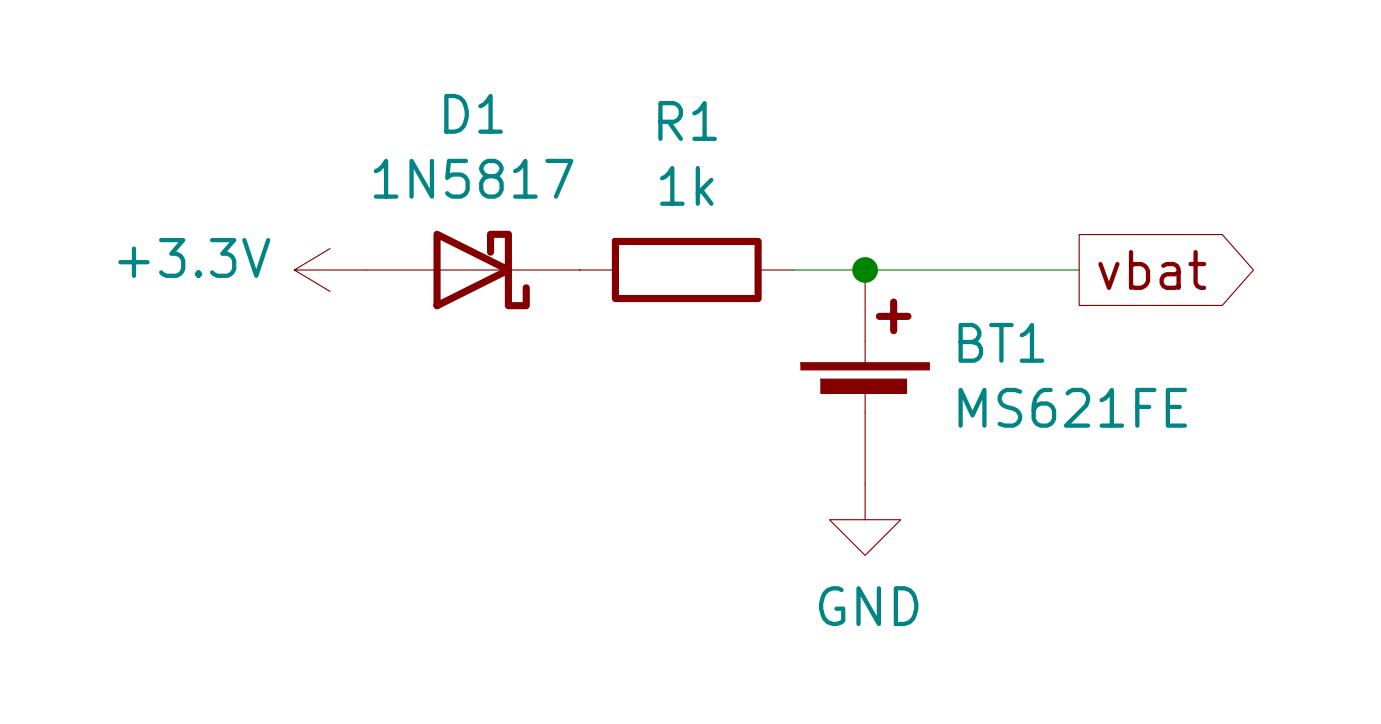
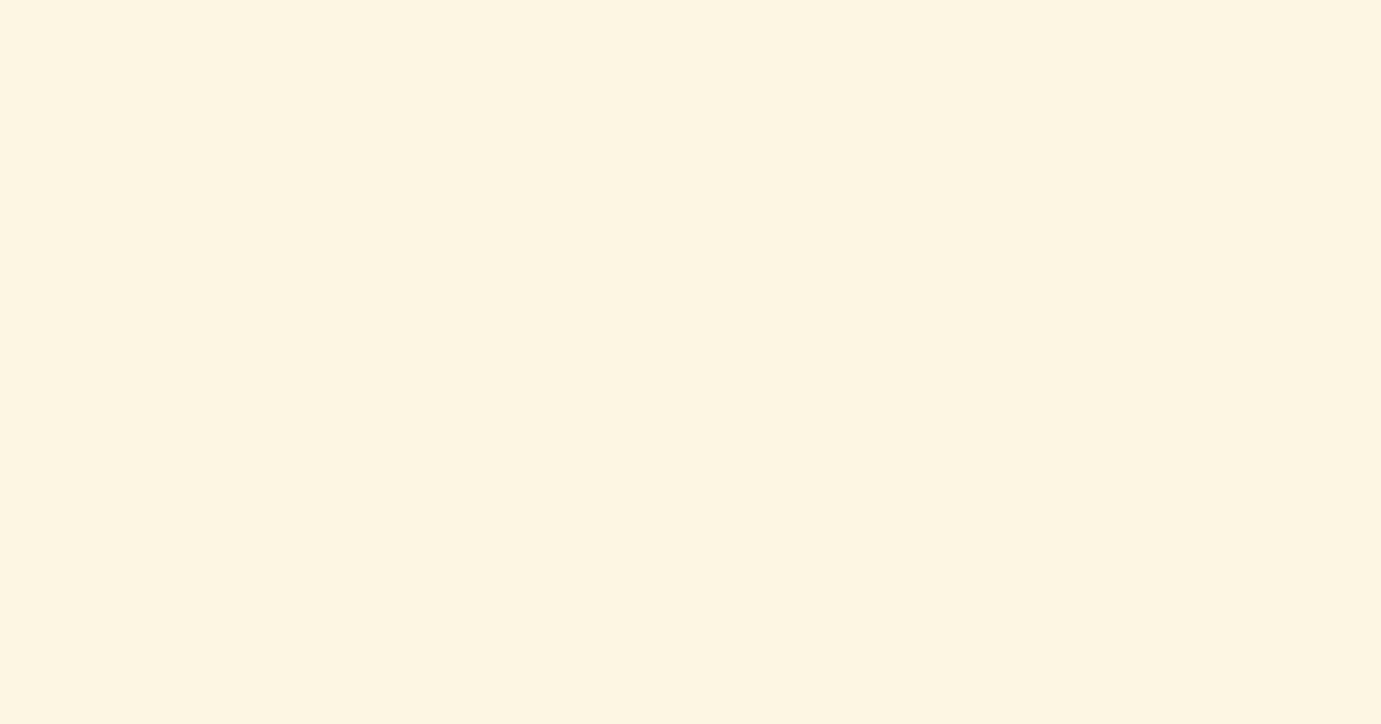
power symbol: +3.3V (330, 269) -> none
D1: 1N5817 (472, 269) -> none
R1: 1k (686, 269) -> none
wire: (793, 269) (1079, 269) -> none
junction: (865, 269) -> none
global label: vbat (1152, 269) -> none
BT1: MS621FE (865, 377) -> none
power symbol: GND (865, 519) -> none

